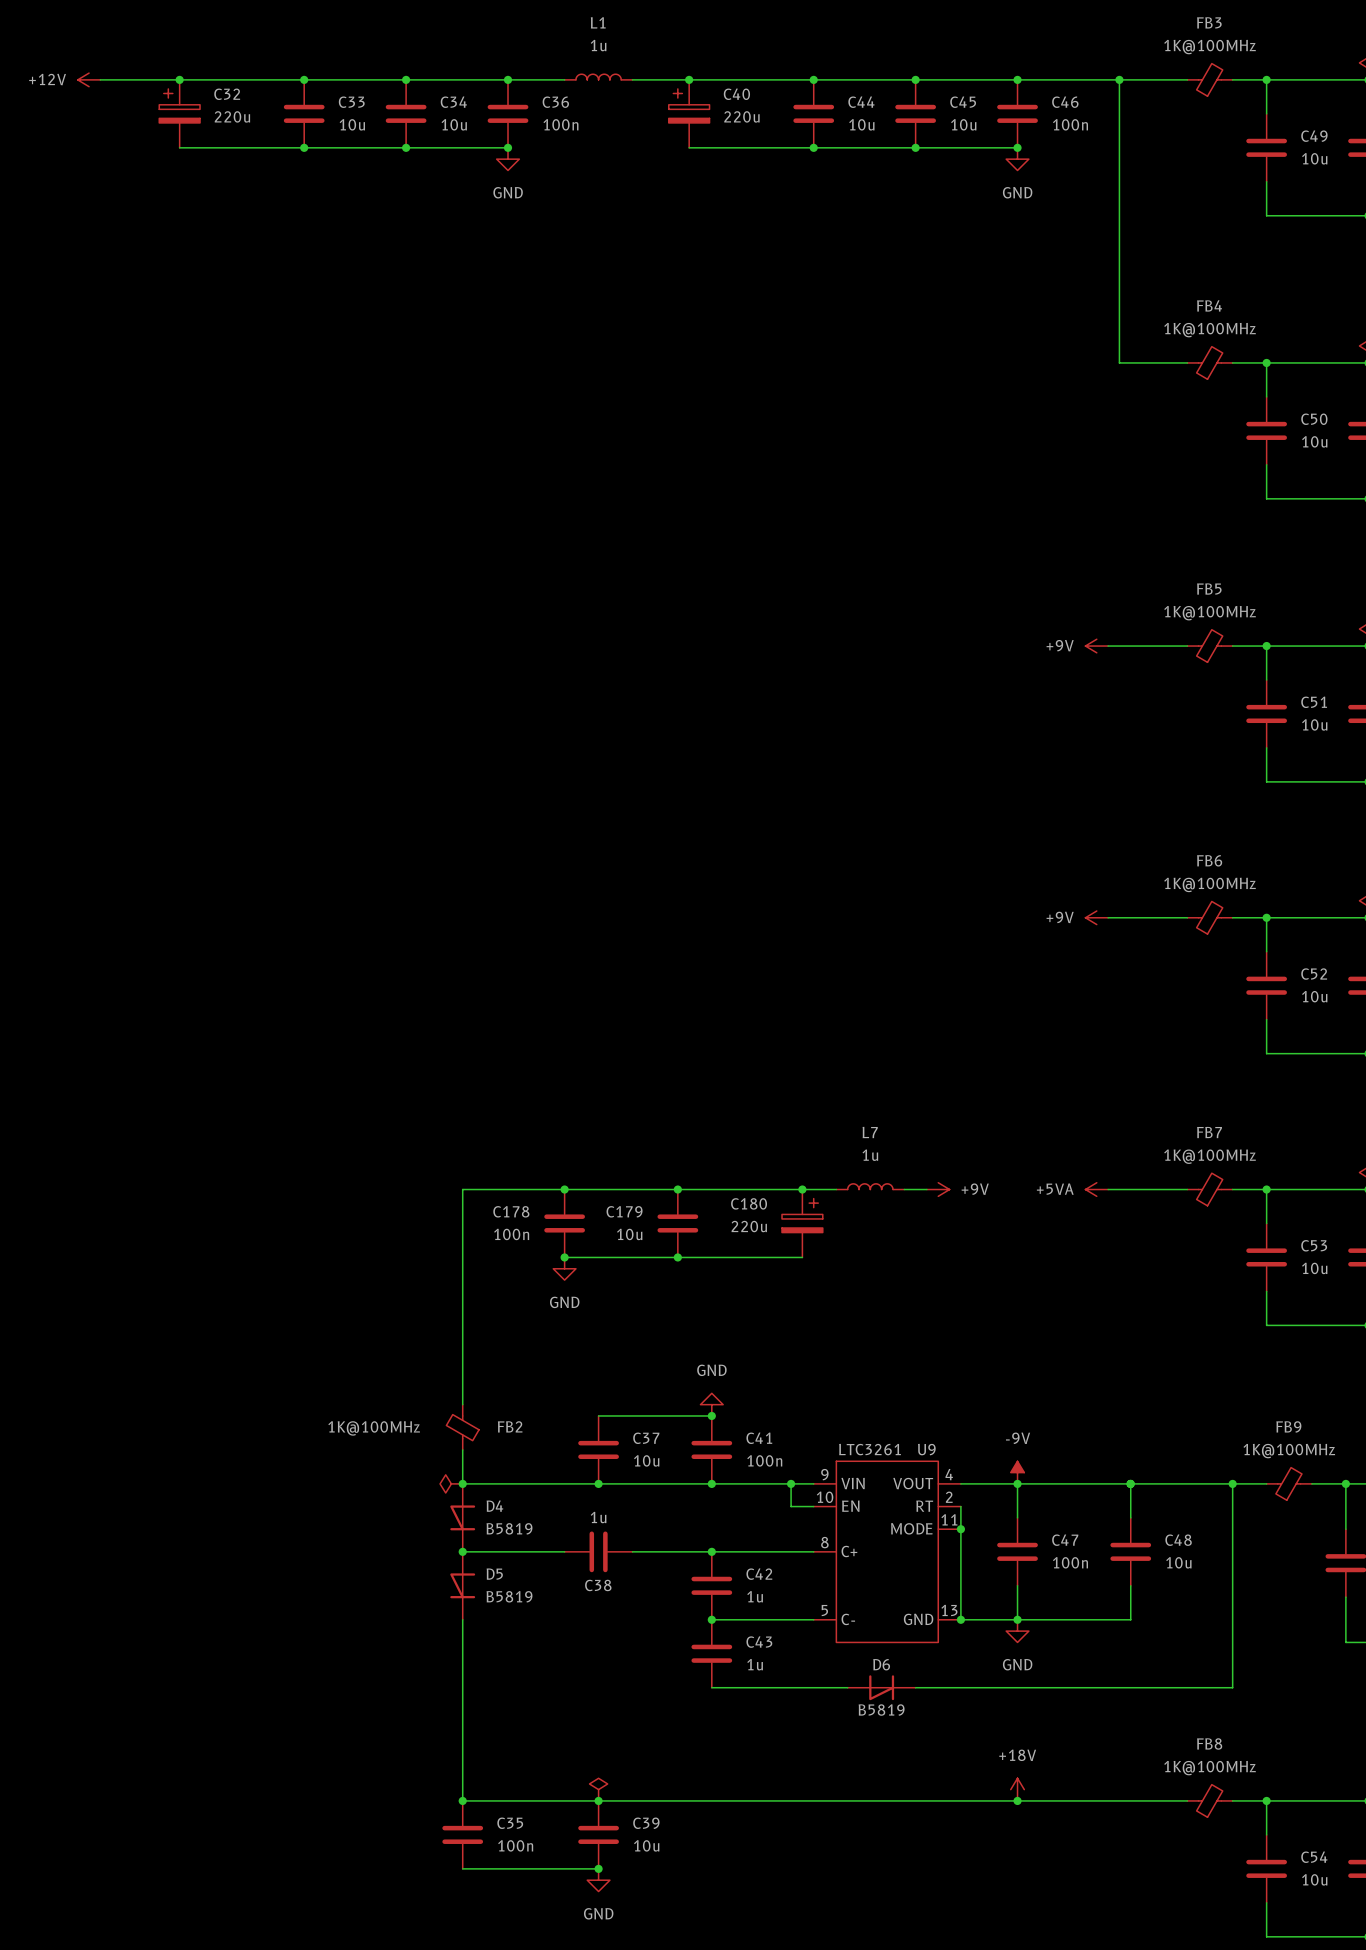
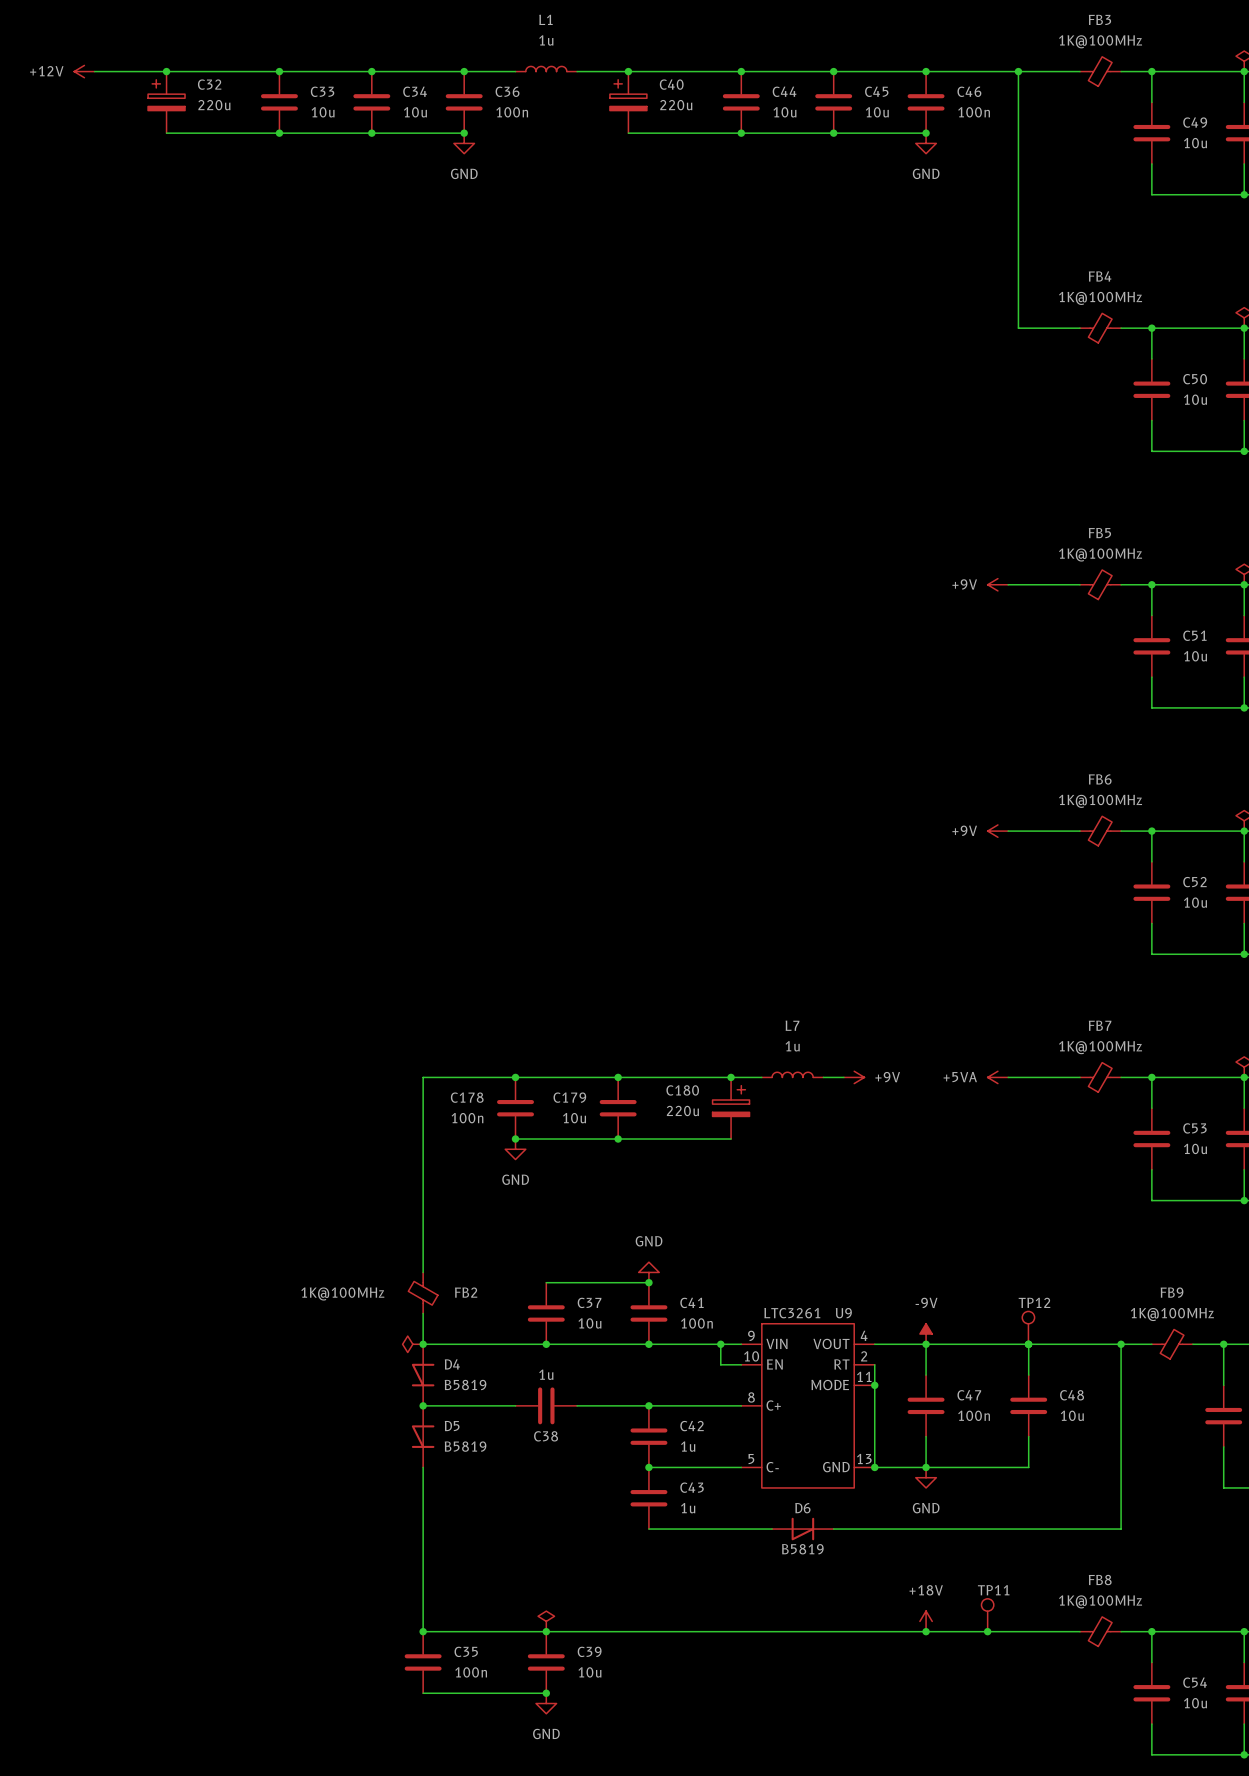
TP12: none -> (1028, 1327)
TP11: none -> (987, 1615)
junction: none -> (987, 1631)

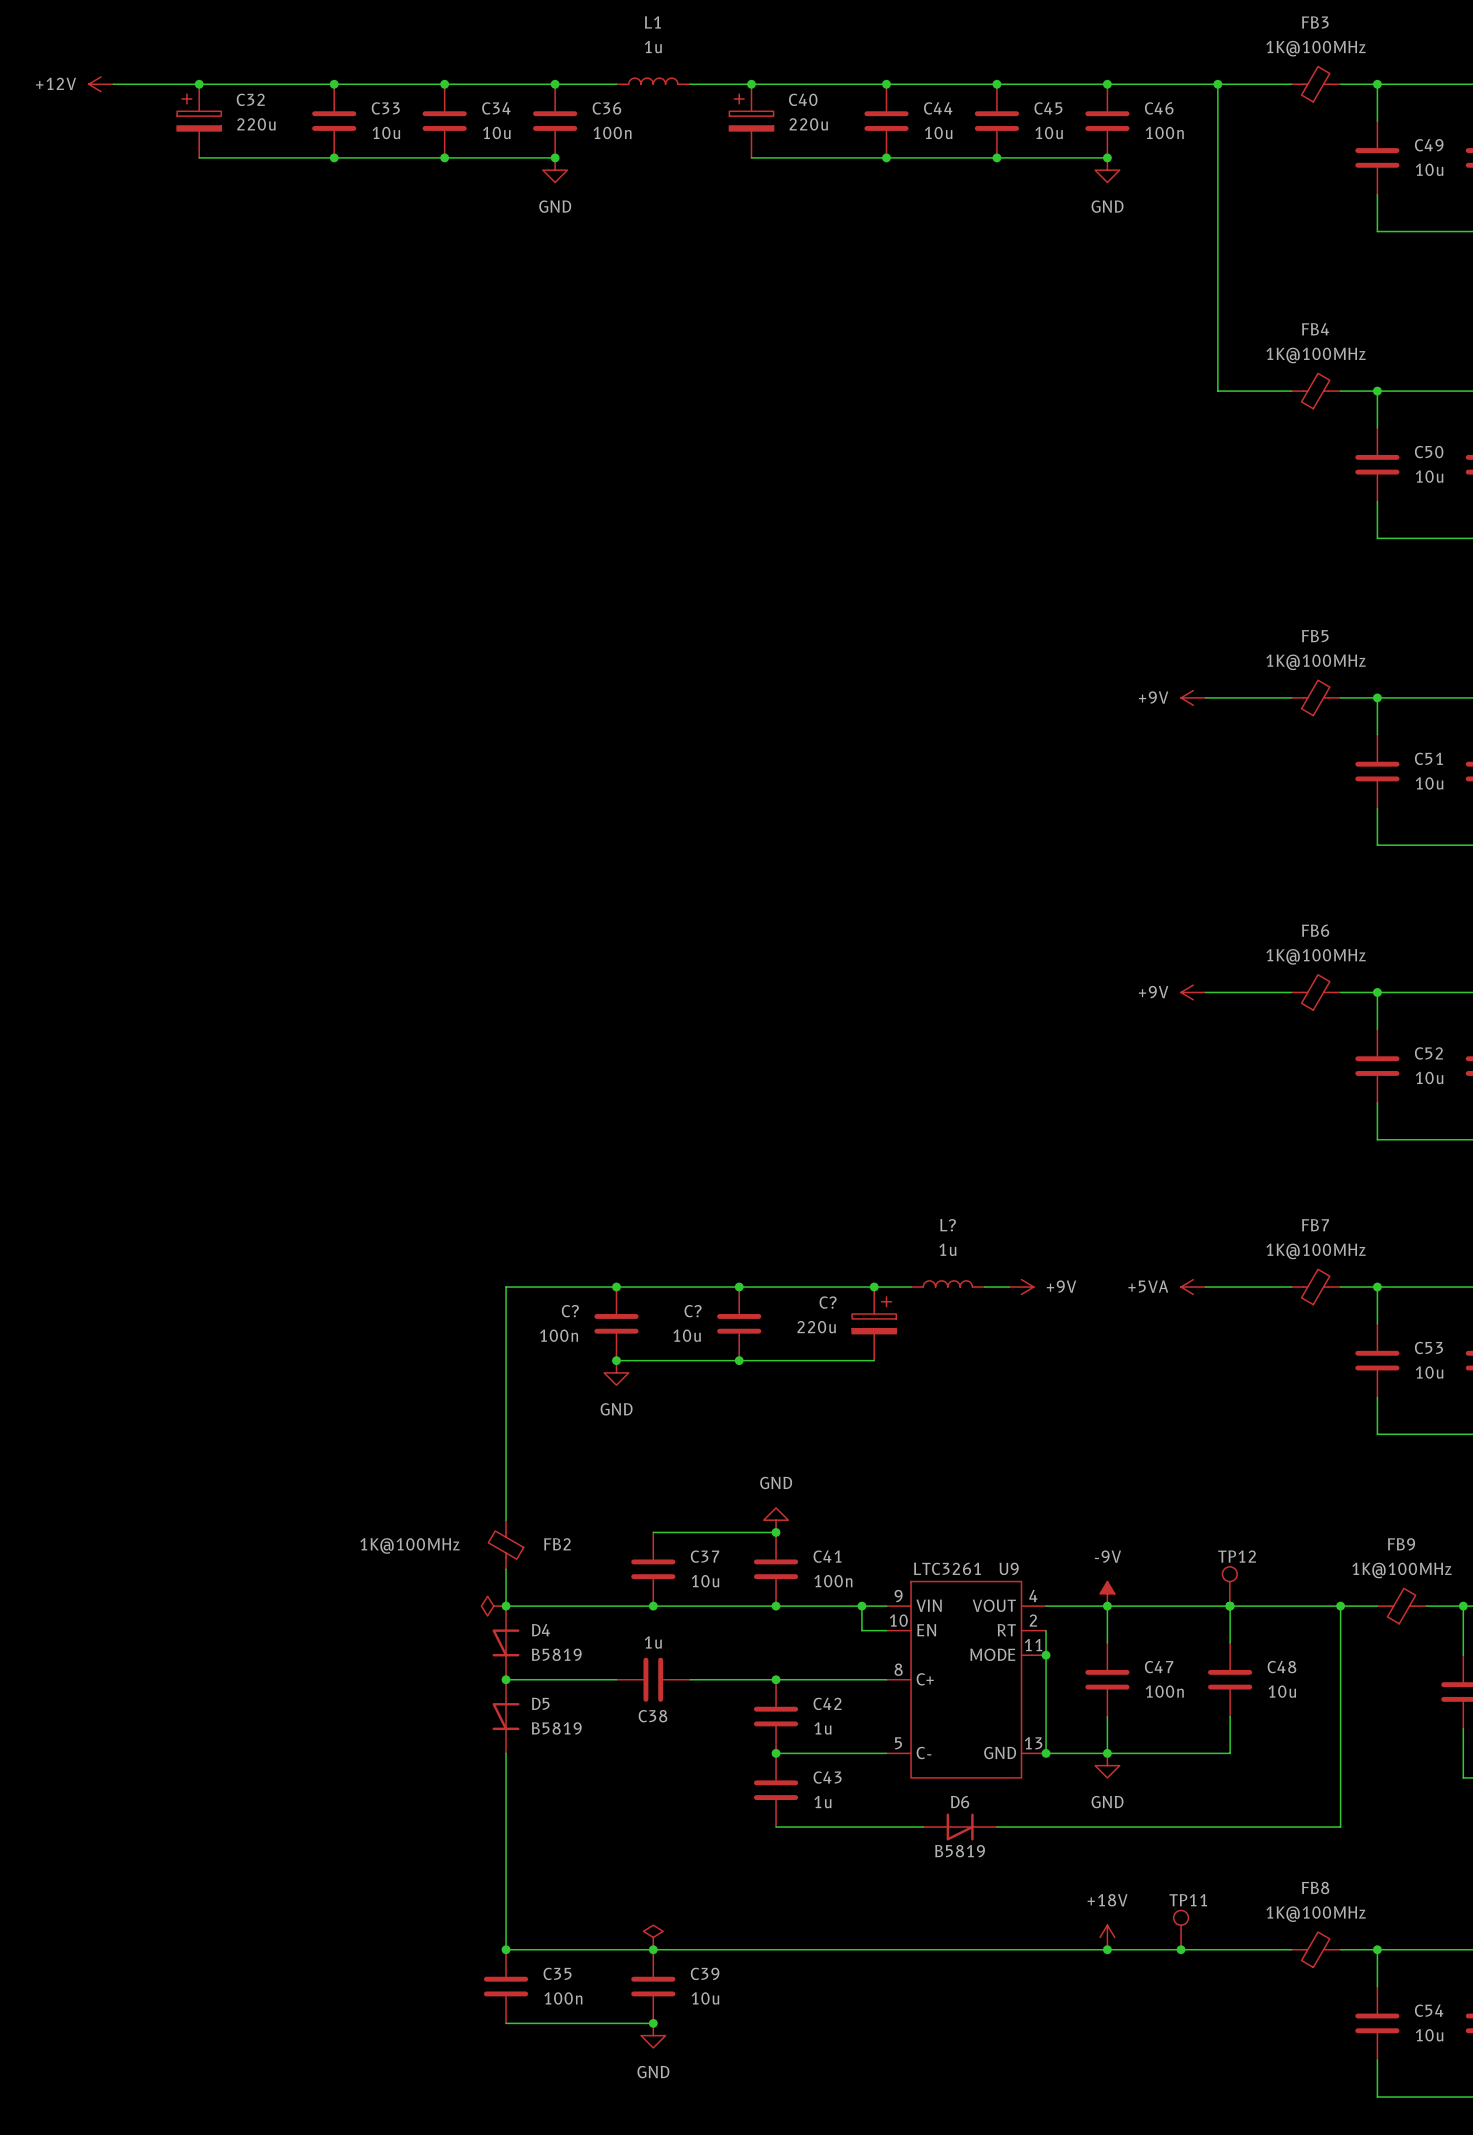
L7 name: L7 (792, 1025) -> L? (948, 1225)
C180 name: C180 (682, 1090) -> C? (828, 1302)
C178 name: C178 (467, 1097) -> C? (570, 1311)
C179 name: C179 (569, 1097) -> C? (693, 1311)

